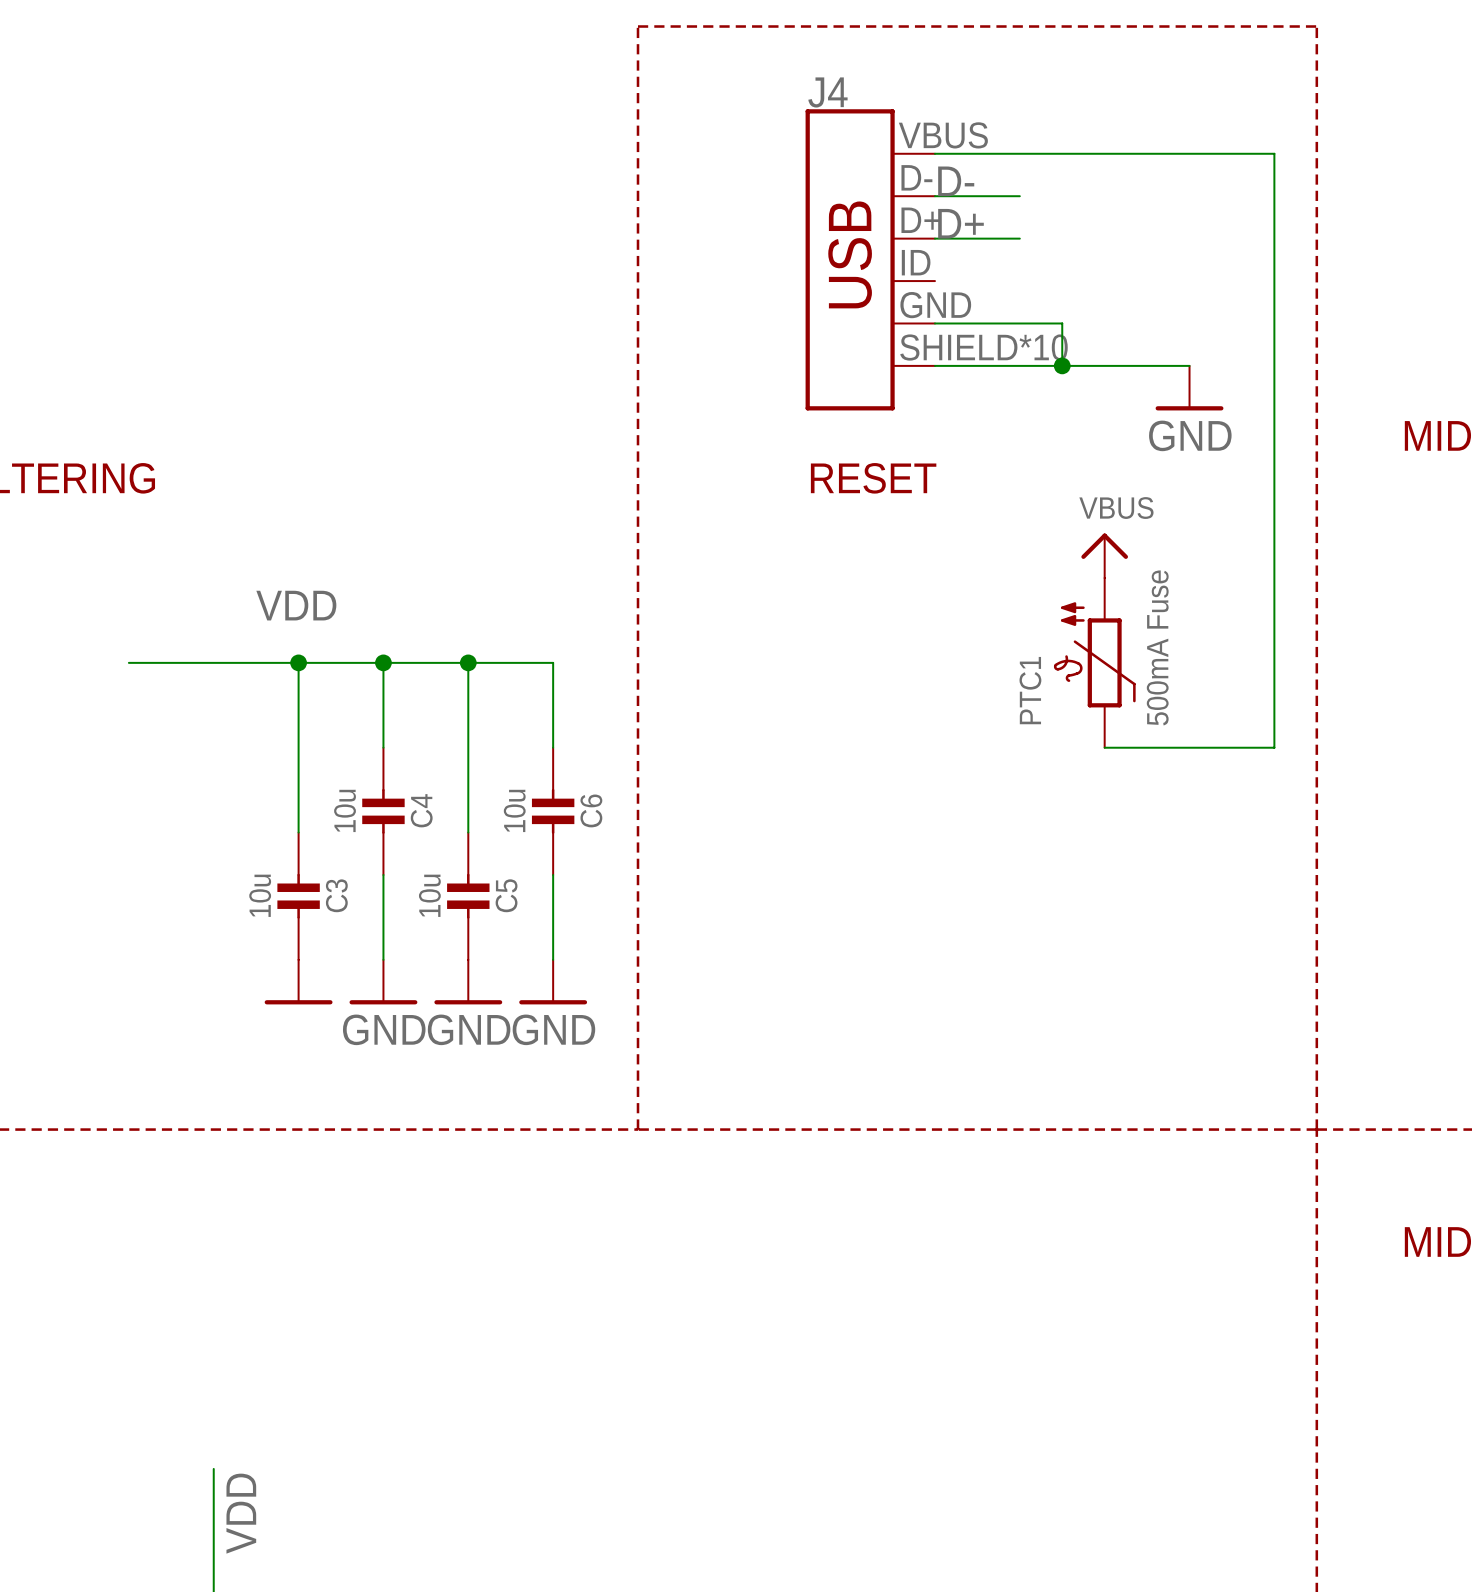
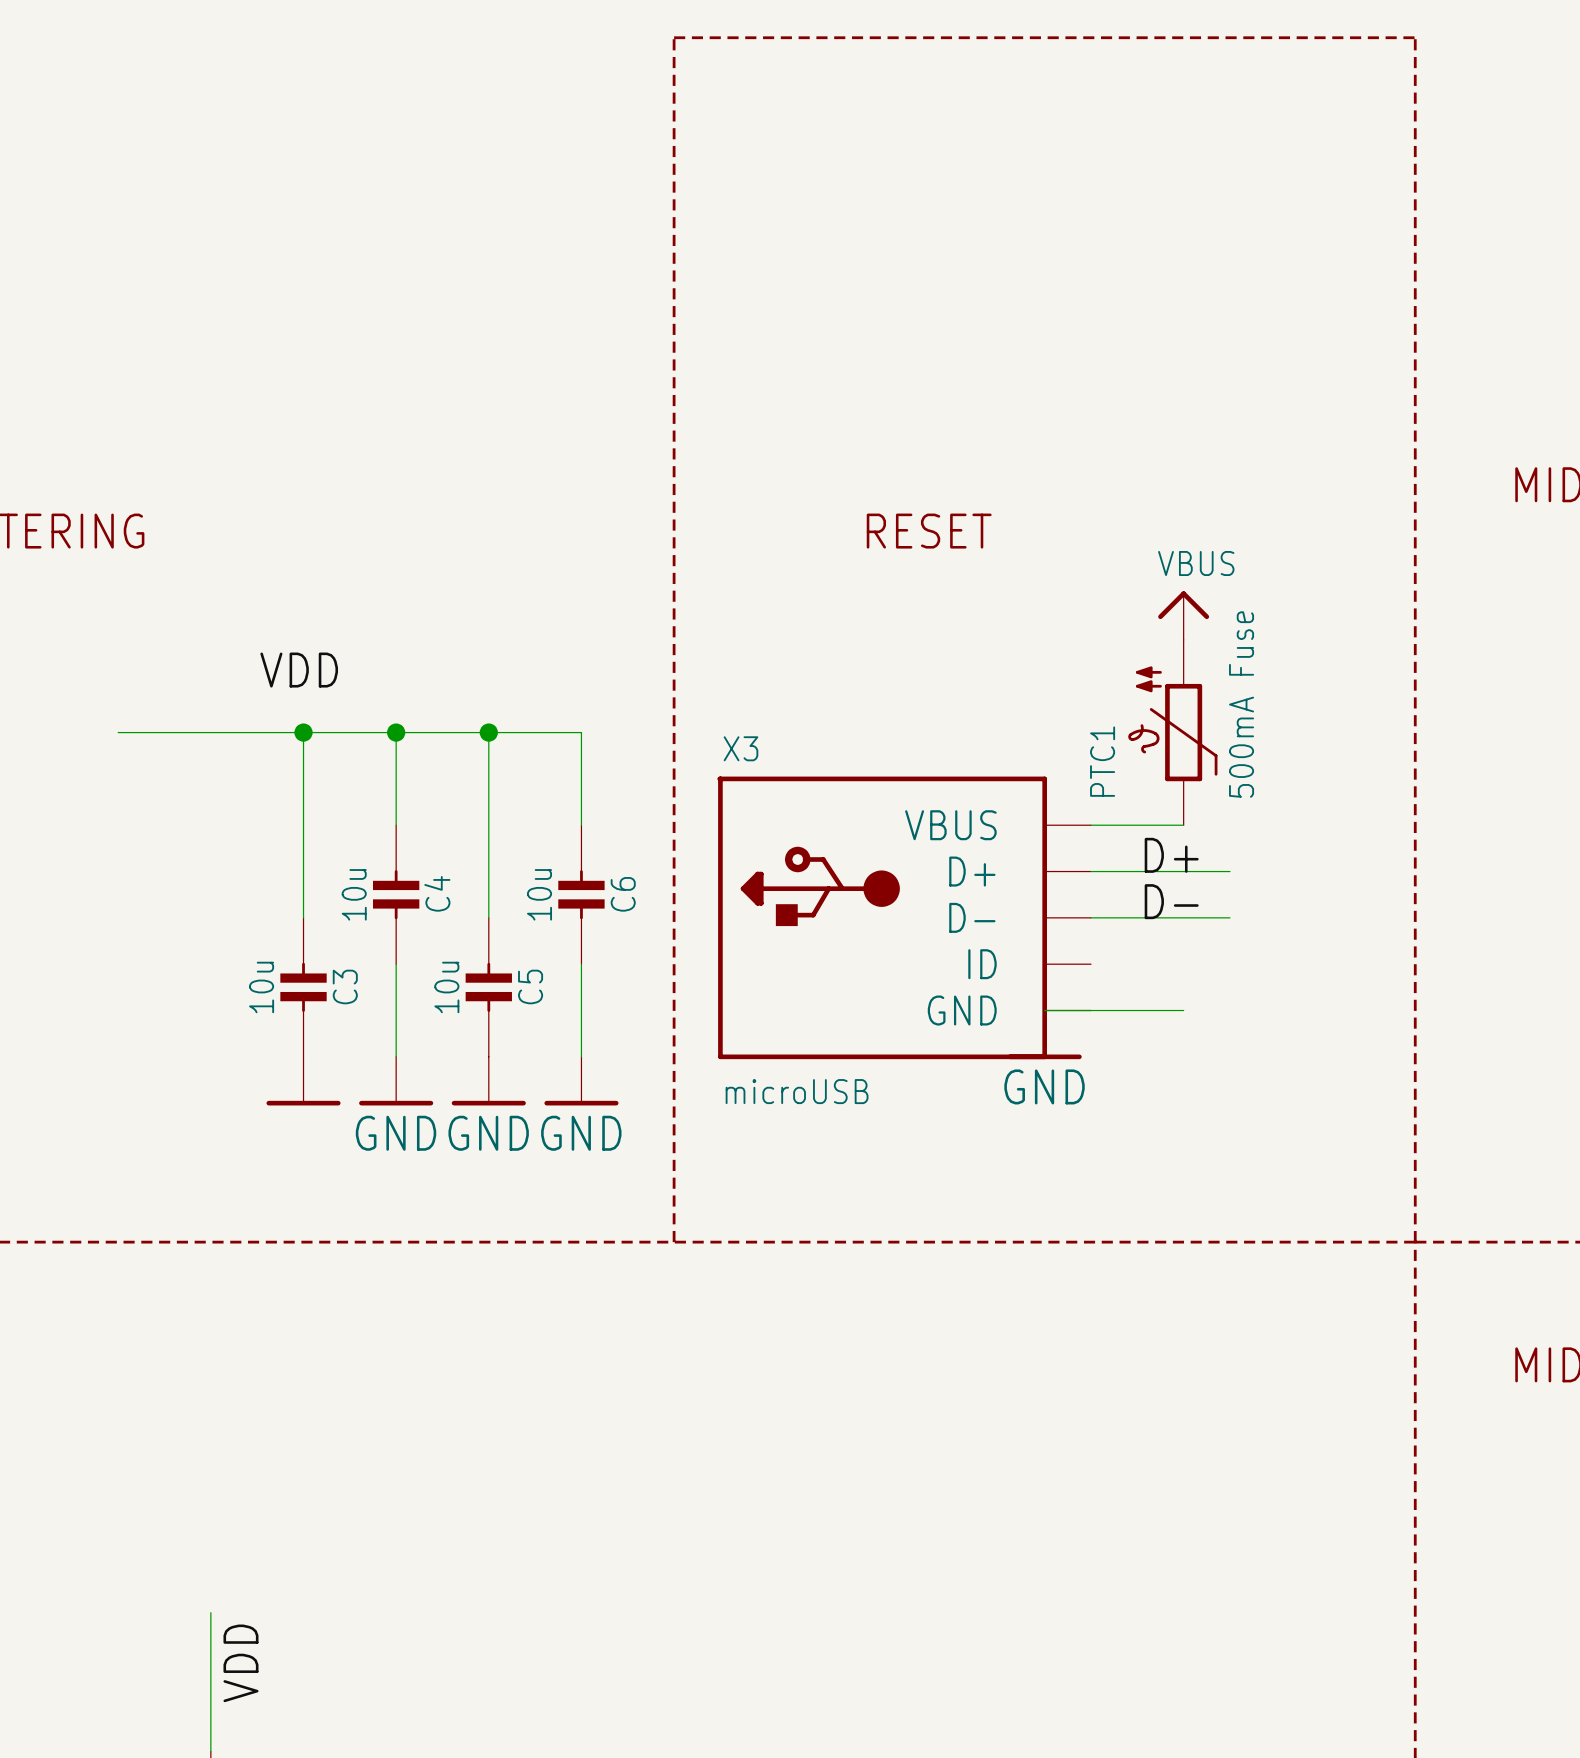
wire: (934, 153) (1274, 153) (1274, 747) (1104, 747) -> (1090, 825) (1183, 825)
label: D- (956, 181) -> none
wire: (934, 196) (1019, 196) -> none
label: D+ (960, 223) -> none
wire: (934, 238) (1019, 238) -> none
J4: (870, 259) -> none
wire: (934, 323) (1062, 323) (1062, 365) -> none
wire: (934, 365) (1189, 365) -> none
junction: (1062, 365) -> none
power symbol: GND (1189, 388) -> none
label: none -> D+ (1171, 855)
wire: none -> (1090, 871) (1229, 871)
label: none -> D- (1171, 901)
X3: none -> microUSB (904, 917)
wire: none -> (1090, 917) (1229, 917)
wire: none -> (1044, 1010) (1183, 1010)
power symbol: none -> GND (1044, 1034)

